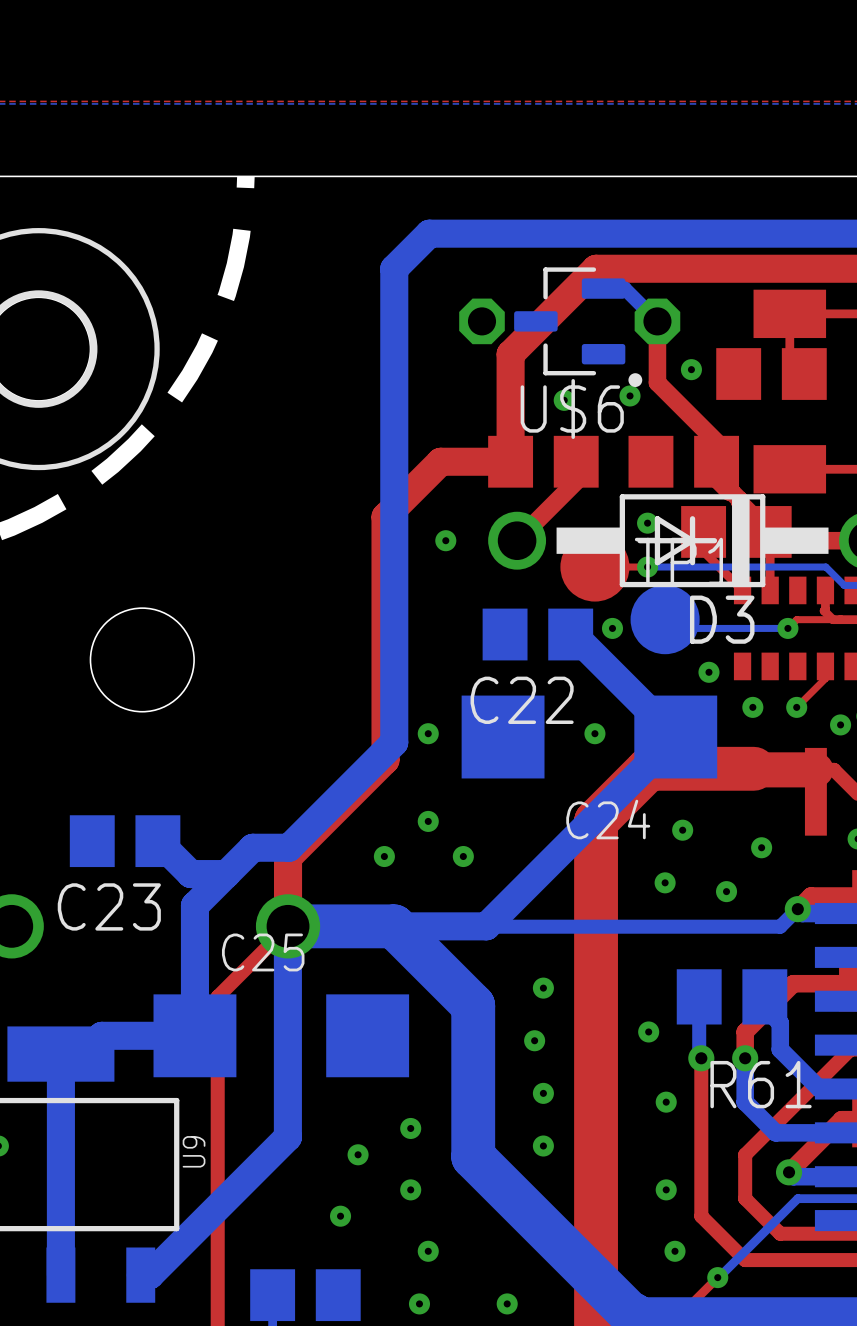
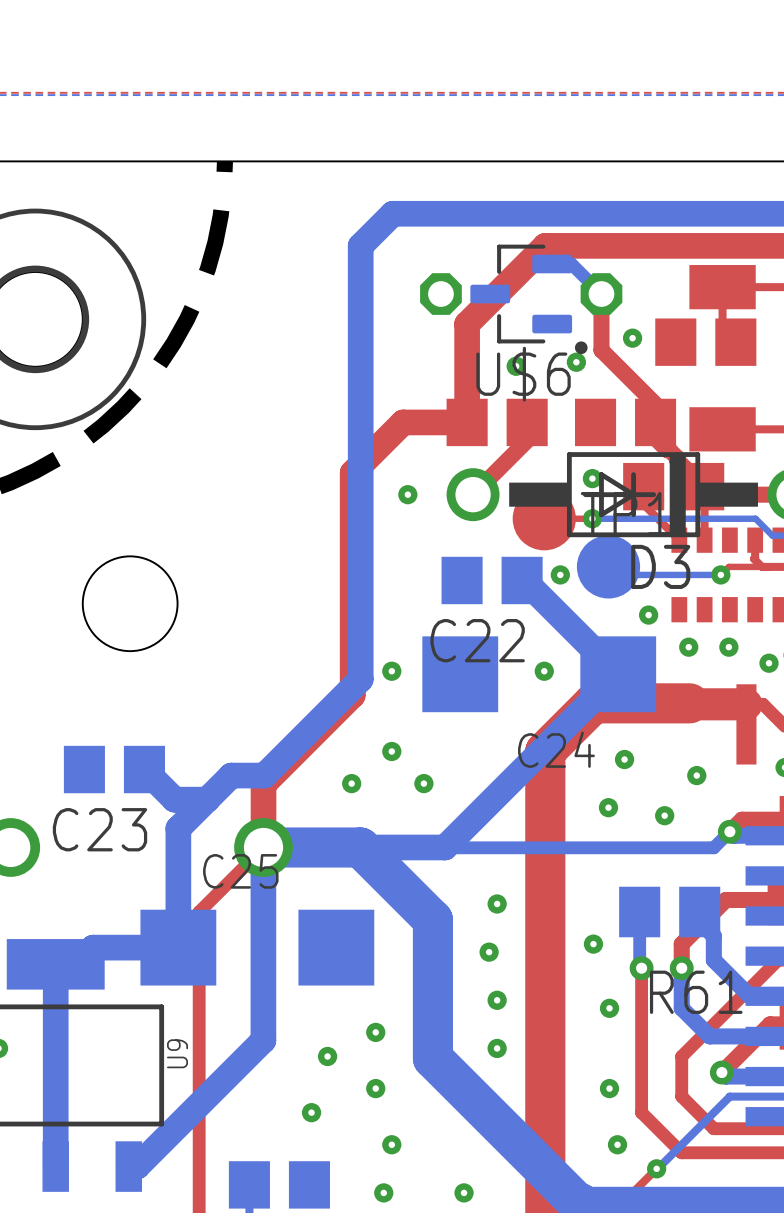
top track: (825, 666) (825, 678) (796, 707) -> none

